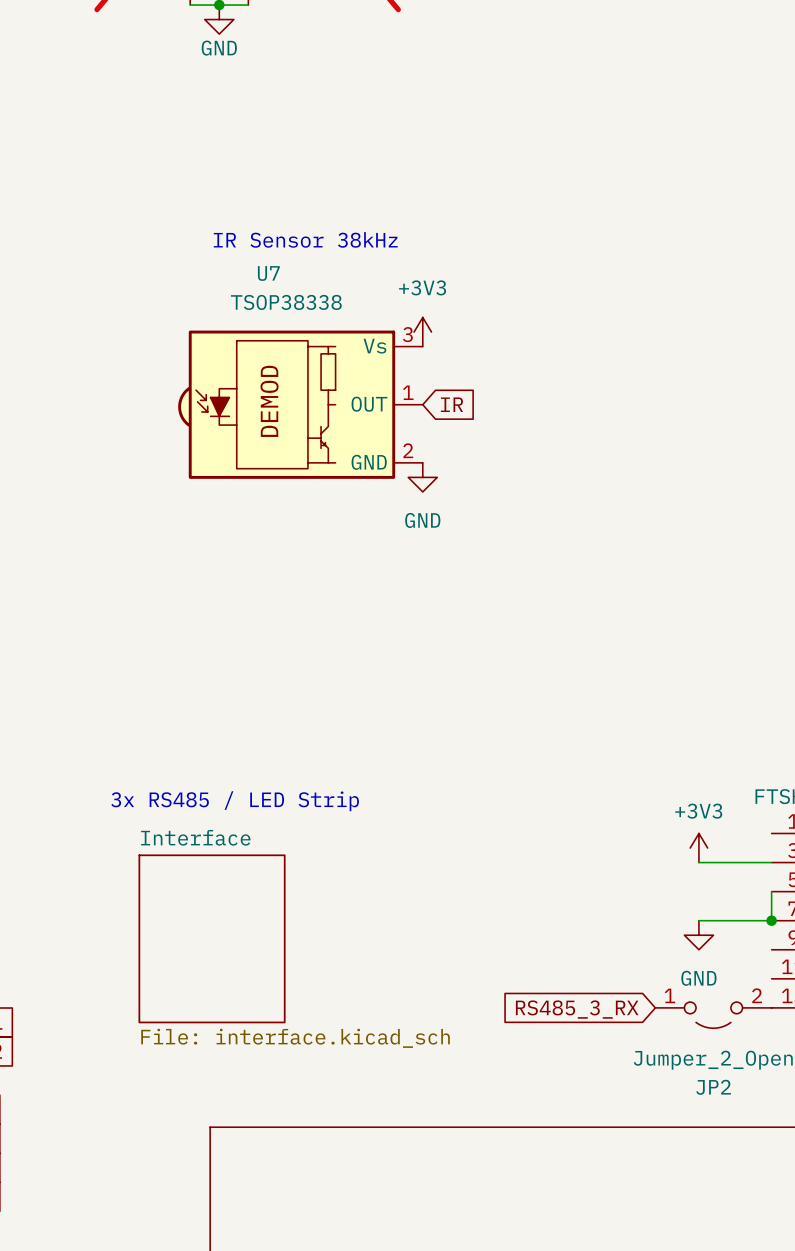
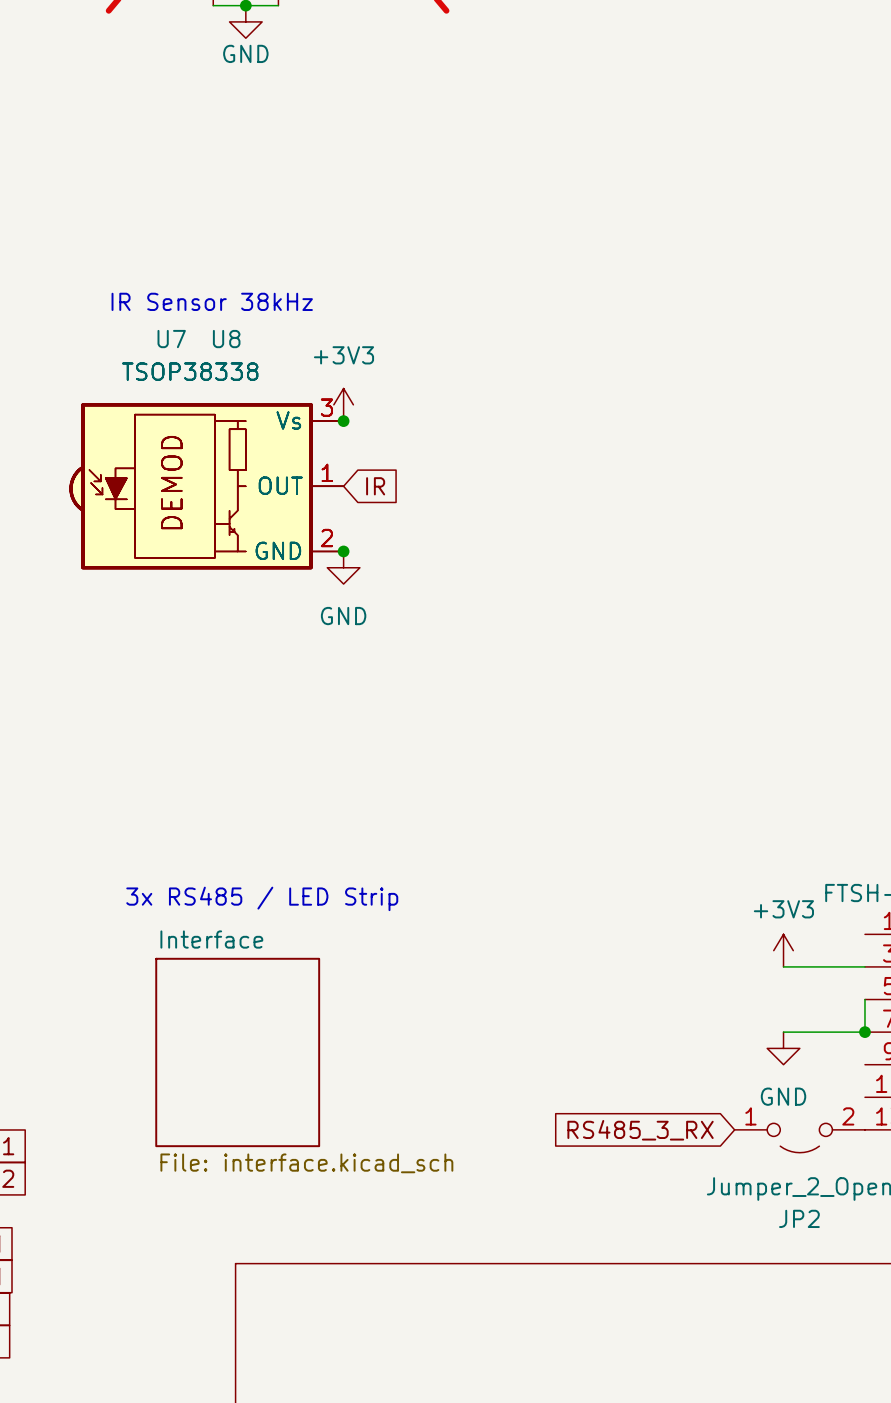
text position: IR Sensor 38kHz (305, 239) -> IR Sensor 38kHz (212, 301)
power symbol position: +3V3 (422, 332) -> +3V3 (343, 404)
junction: none -> (343, 421)
U7 position: (300, 404) -> (206, 486)
global label position: IR (451, 404) -> IR (375, 486)
U8: none -> TSOP38338 (206, 486)
power symbol position: GND (422, 477) -> GND (343, 567)
junction: none -> (343, 551)

